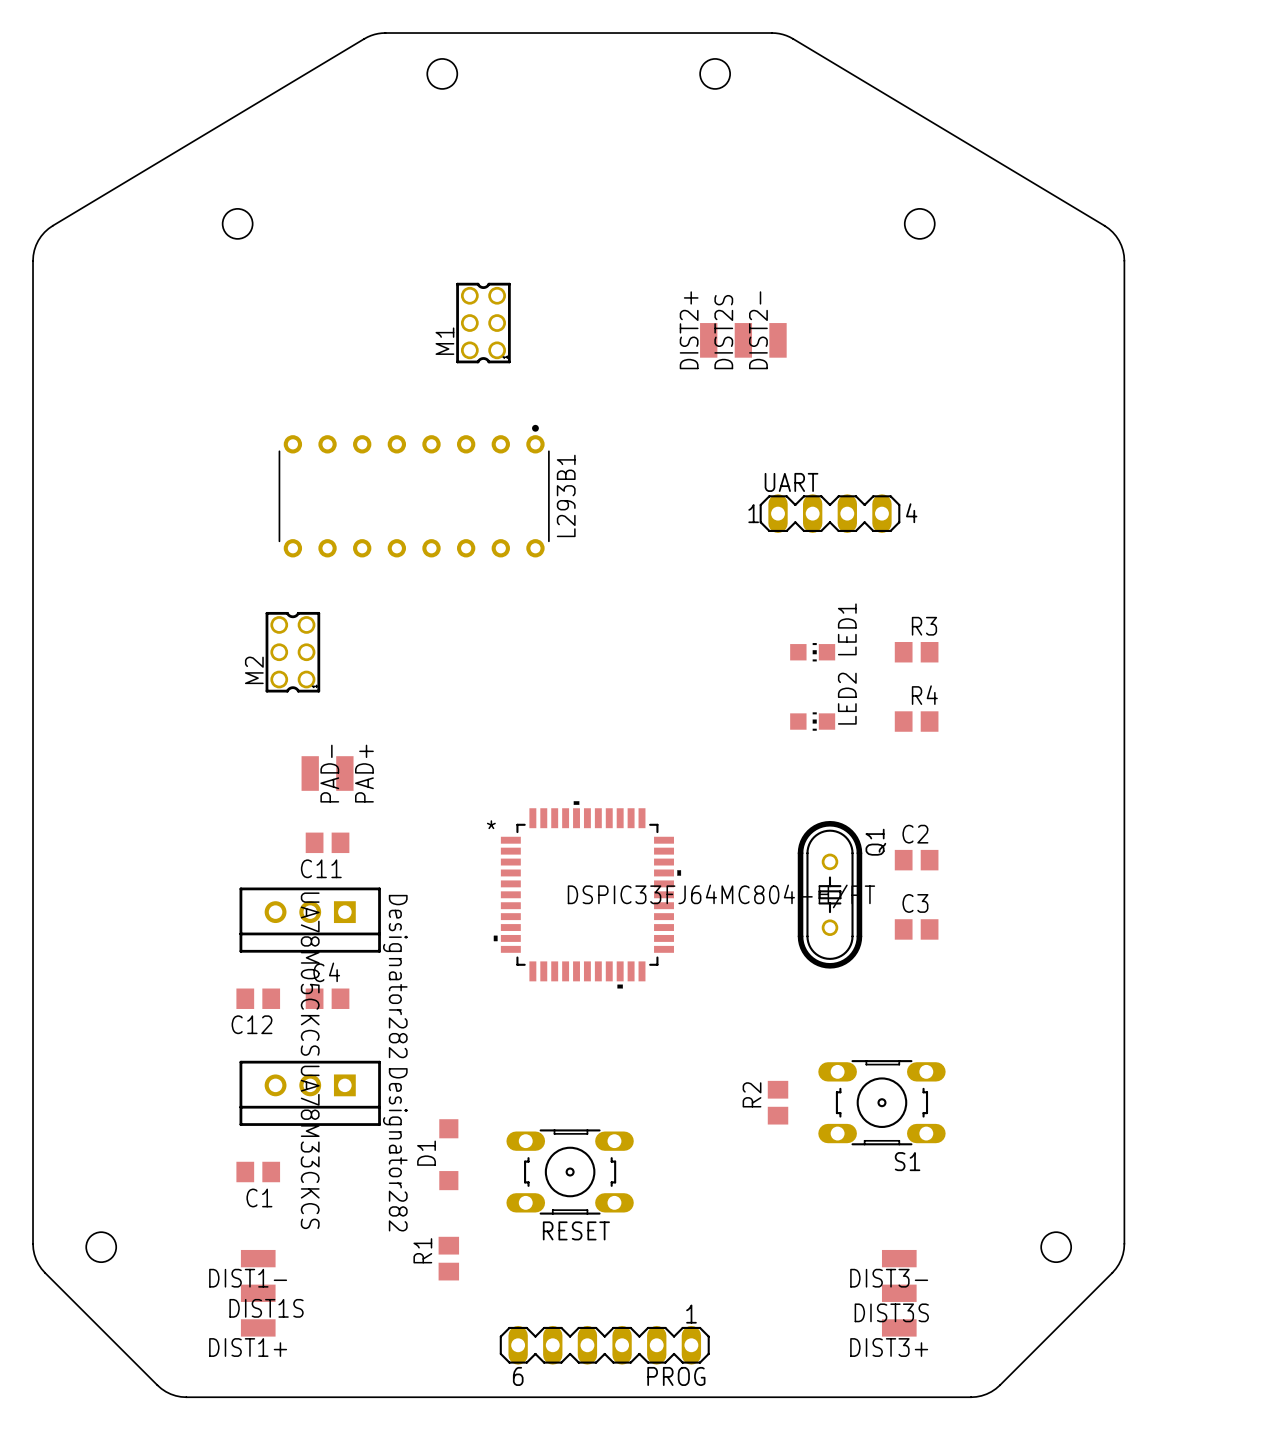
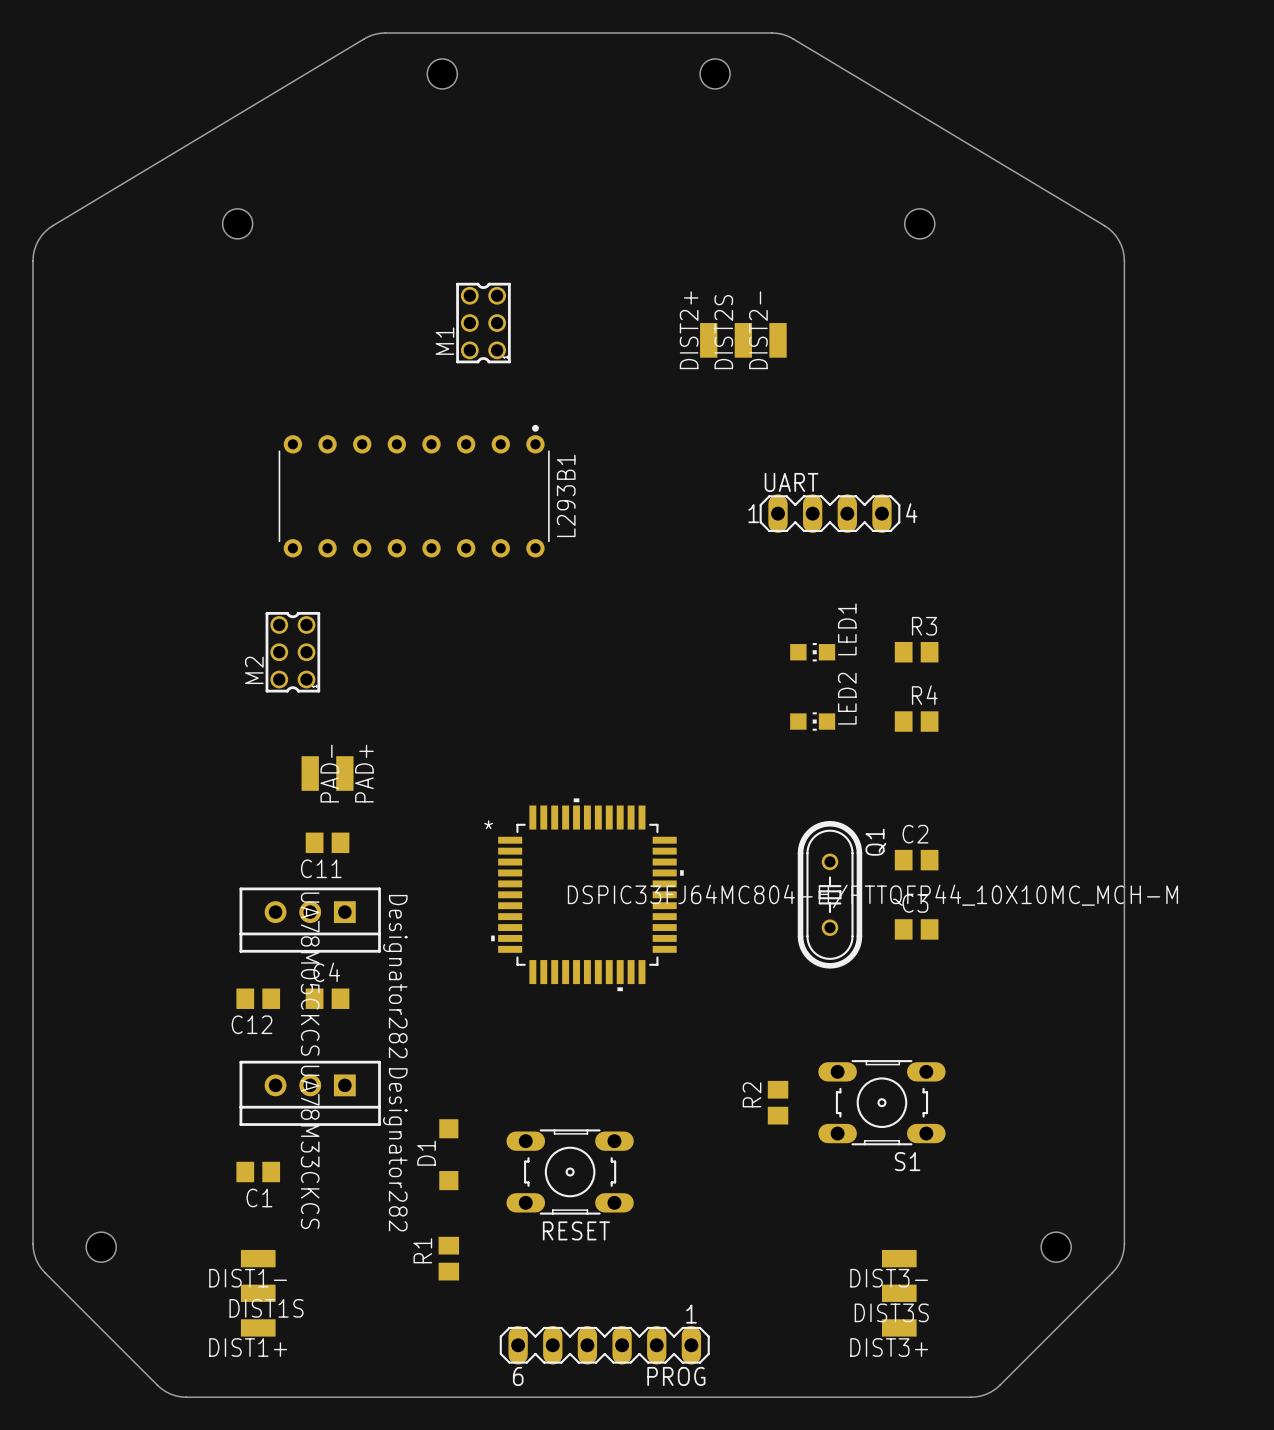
part footprint: [493, 801, 682, 989] -> [491, 798, 684, 992]
part value: DSPIC33FJ64MC804-H/PT (721, 896) -> DSPIC33FJ64MC804-H/PTTQFP44_10X10MC_MCH-M (872, 896)

